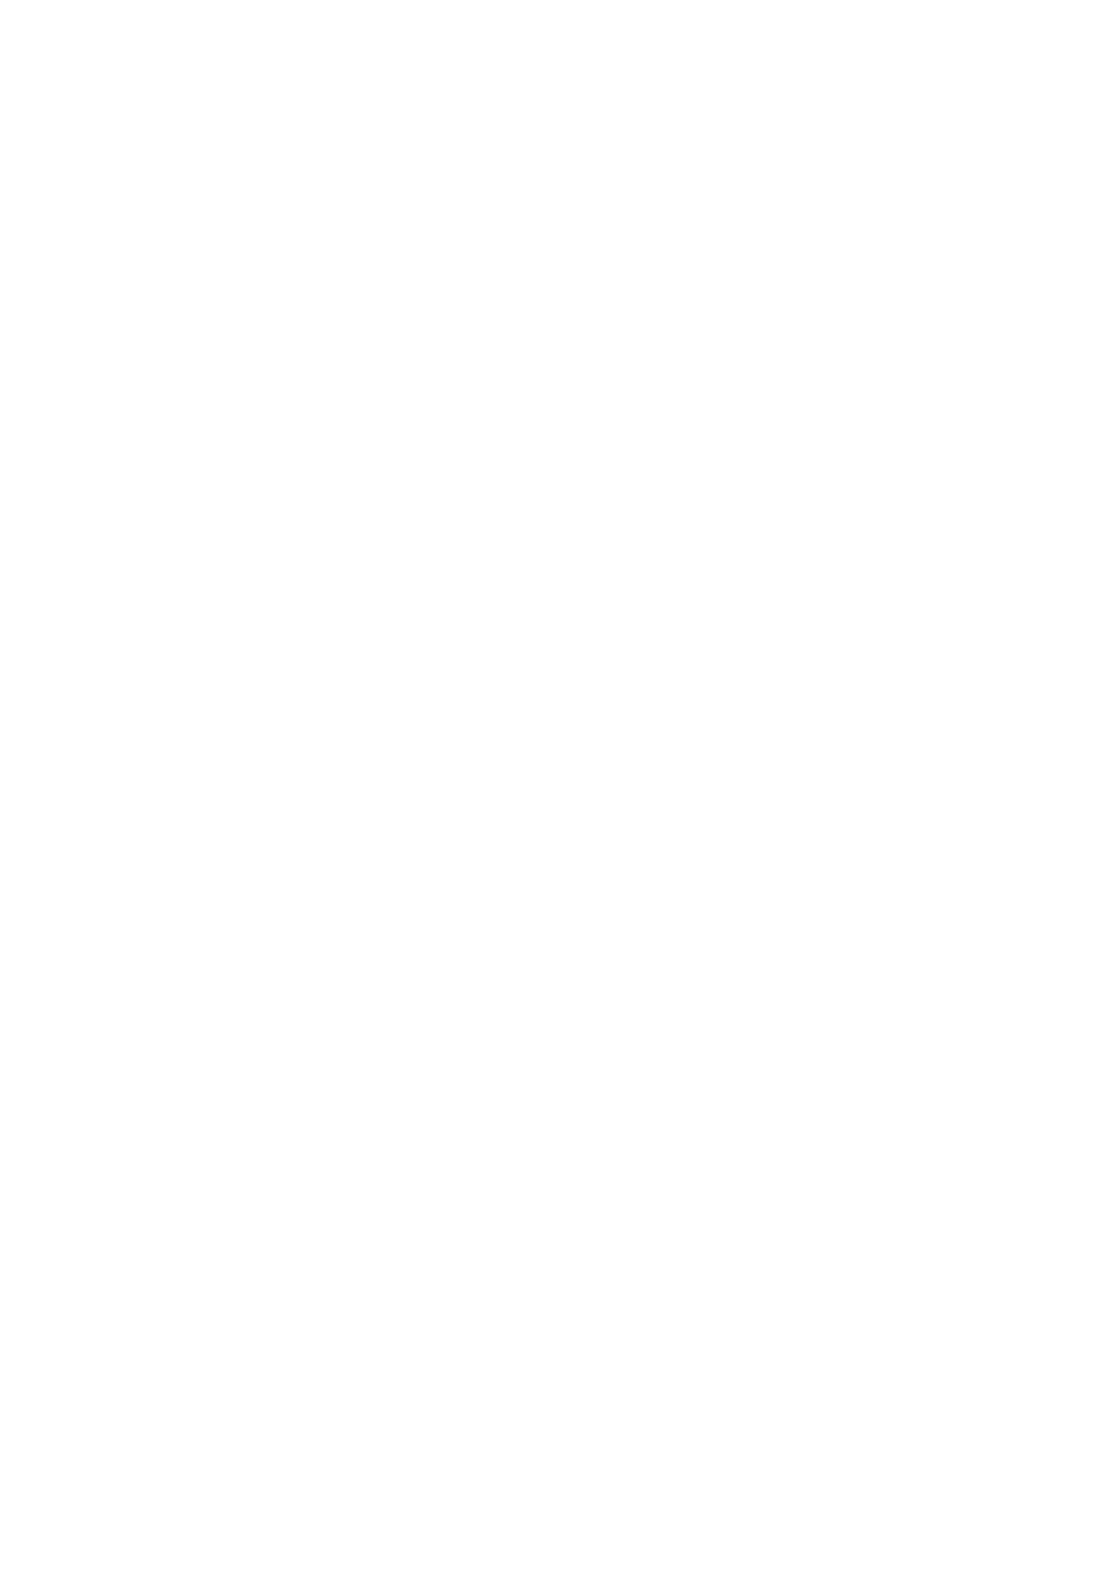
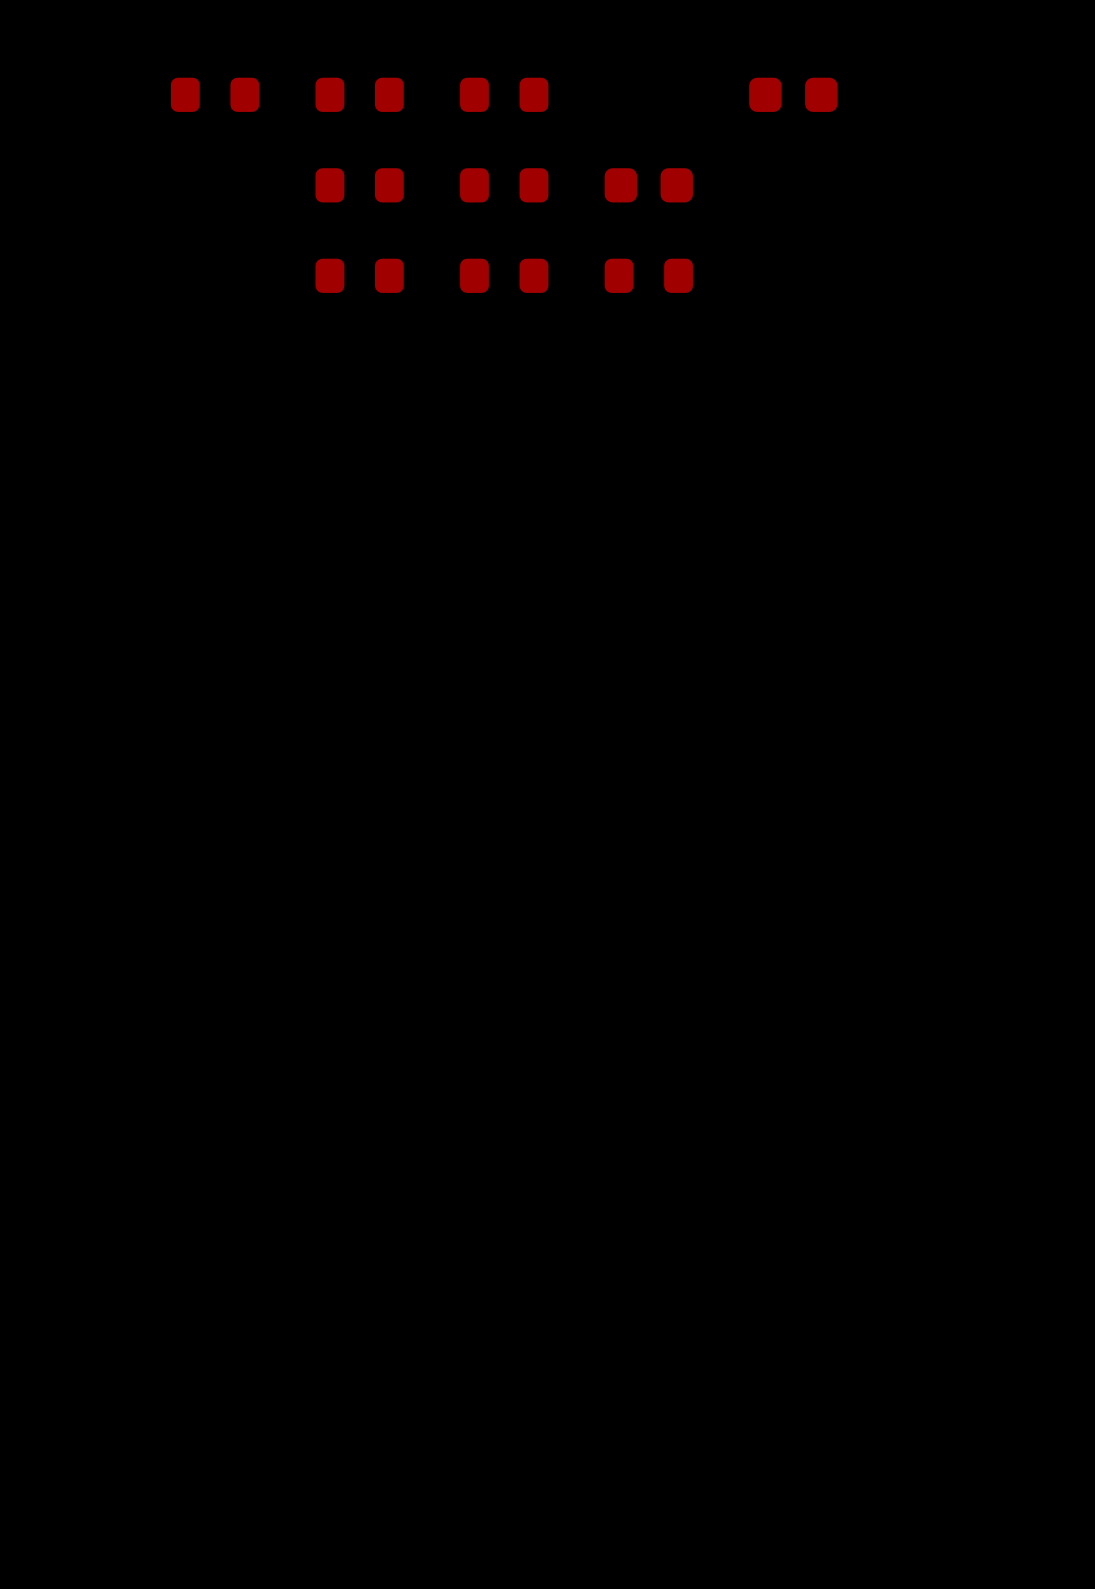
part: none -> (215, 94)
part: none -> (359, 94)
part: none -> (504, 94)
part: none -> (793, 94)
part: none -> (359, 185)
part: none -> (504, 185)
part: none -> (648, 185)
part: none -> (359, 275)
part: none -> (504, 275)
part: none -> (648, 275)

